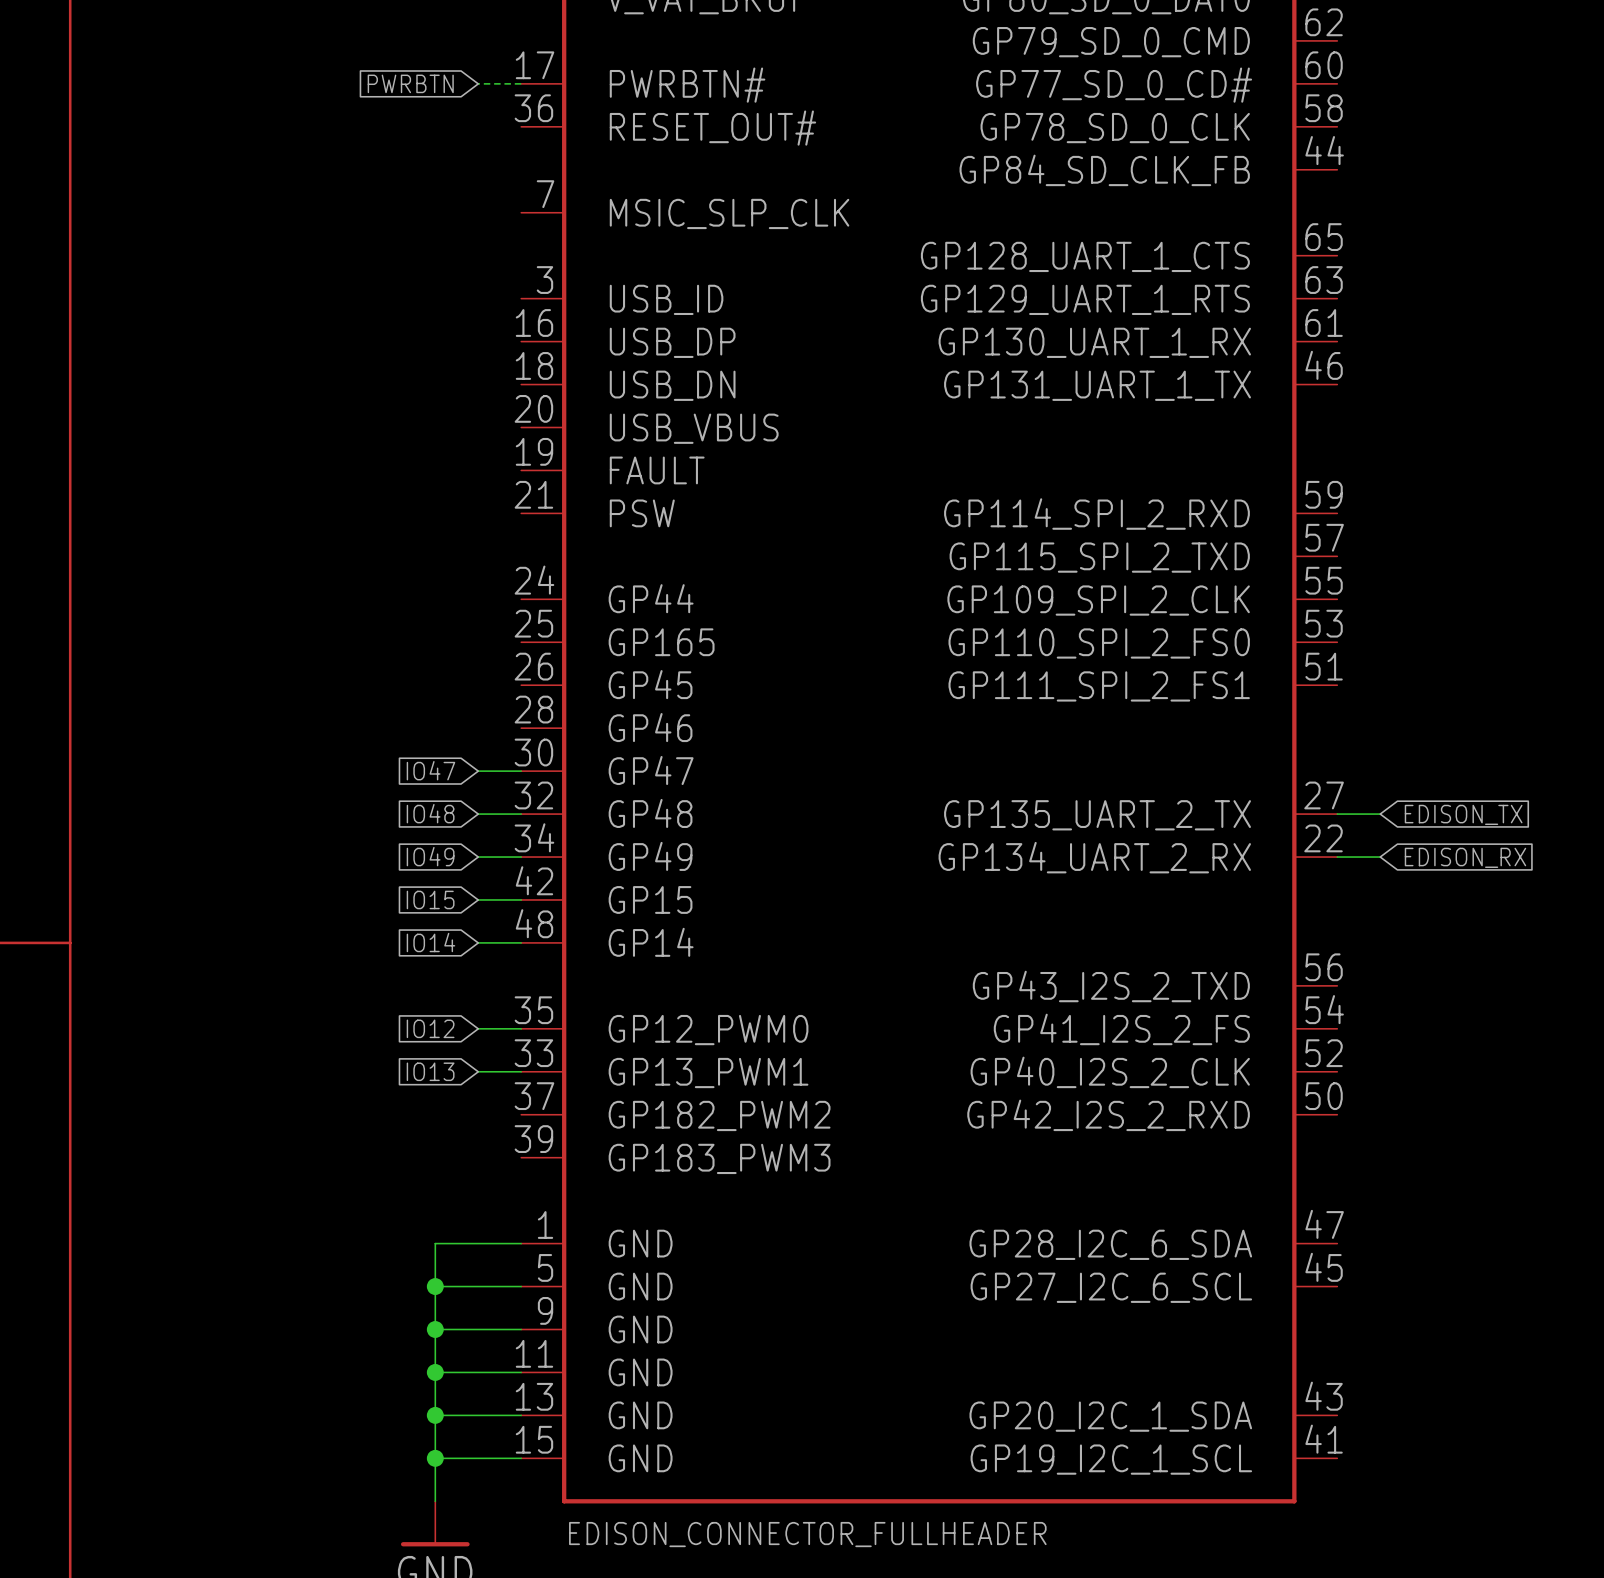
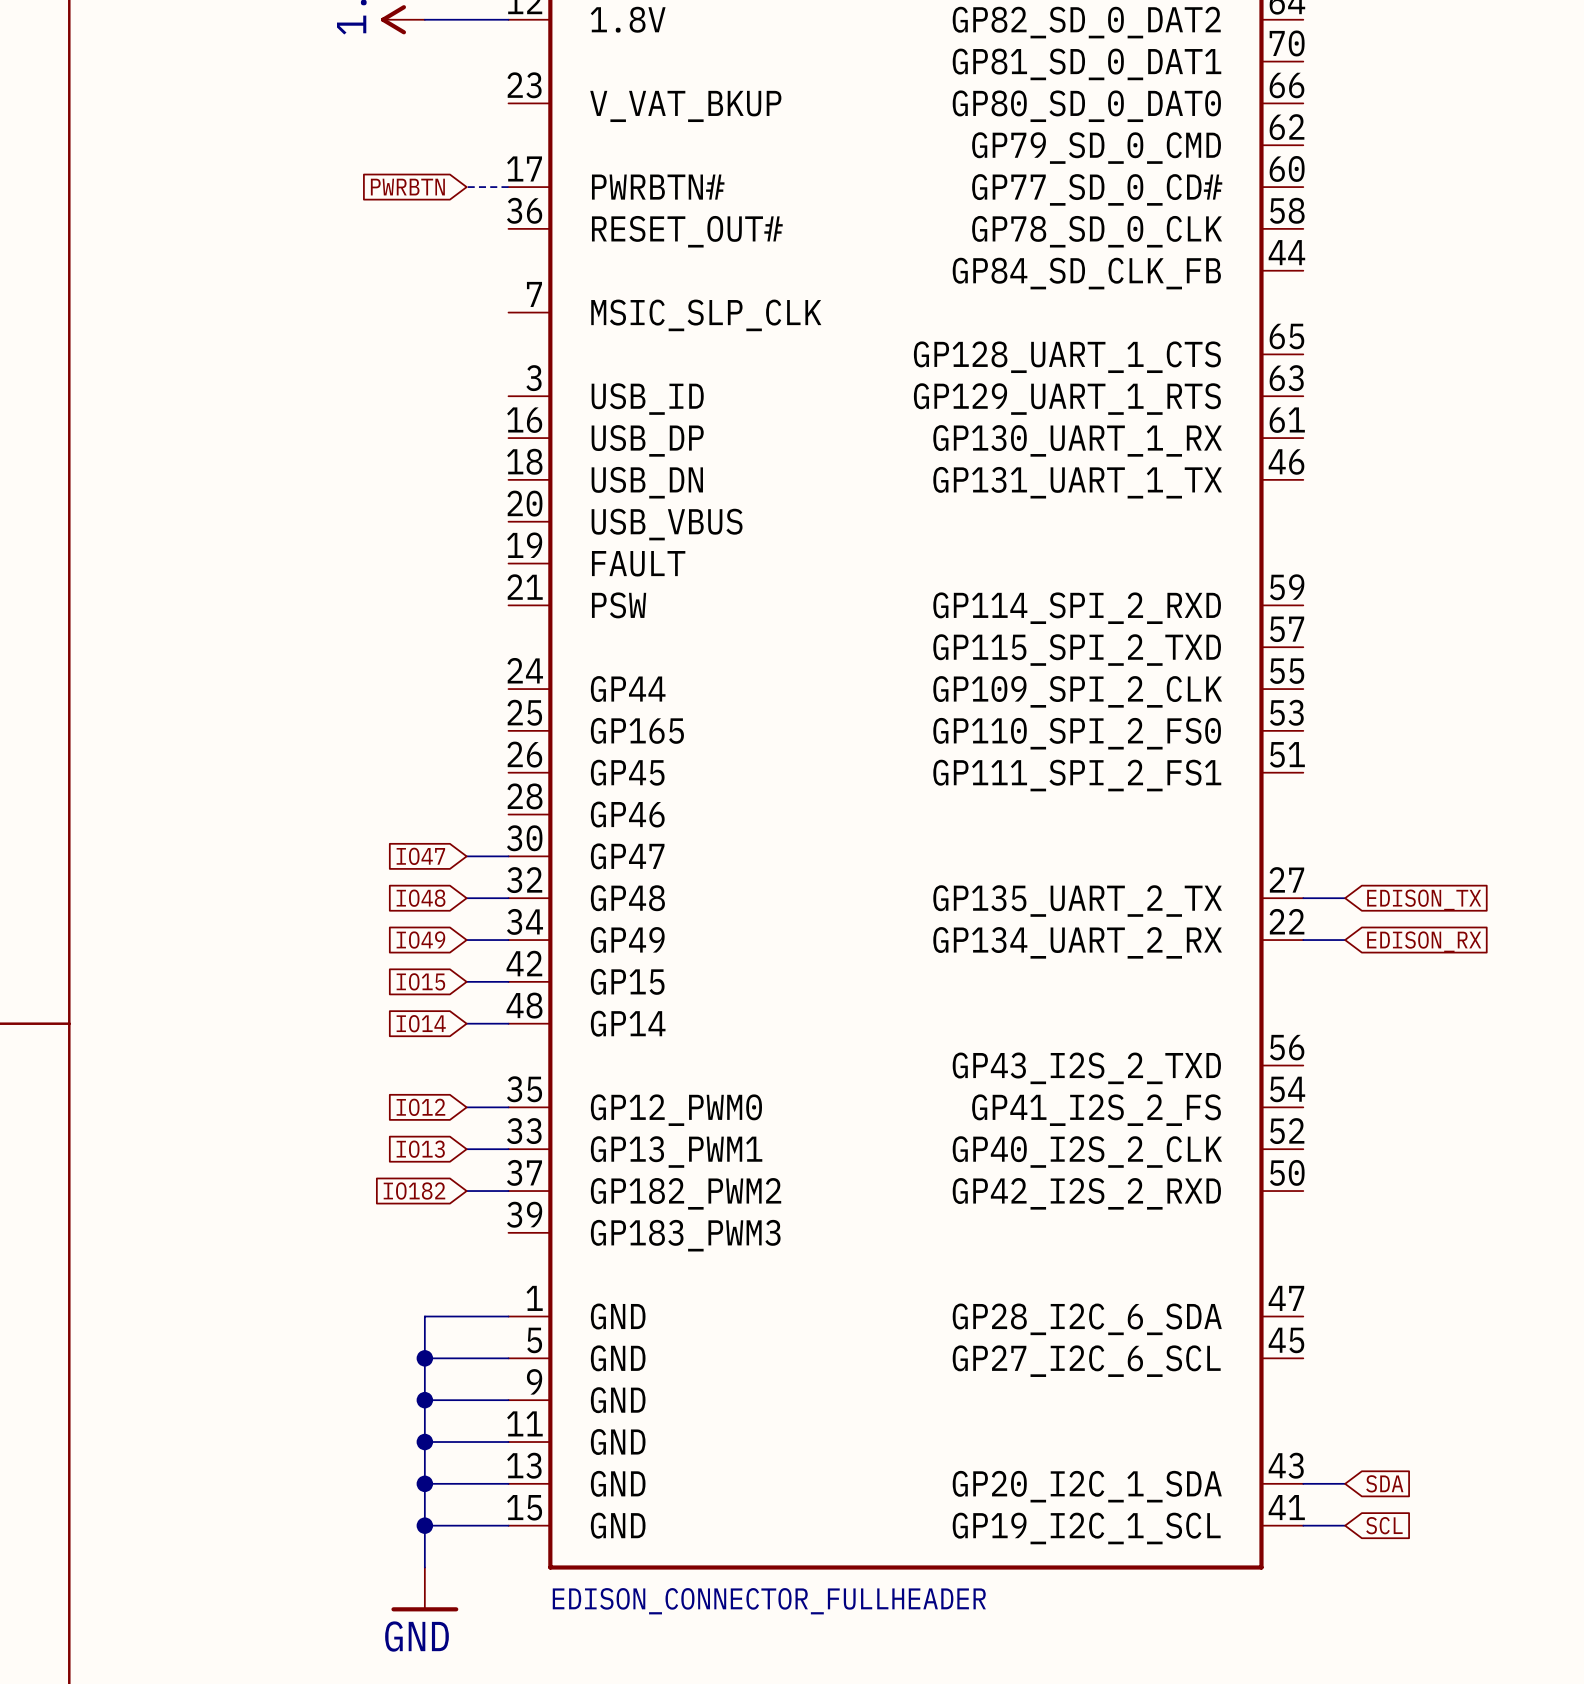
global label: none -> IO182 (414, 1191)
wire: none -> (466, 1191) (508, 1191)
wire: none -> (1303, 1483) (1345, 1483)
global label: none -> SDA (1384, 1483)
wire: none -> (1303, 1525) (1345, 1525)
global label: none -> SCL (1384, 1525)

